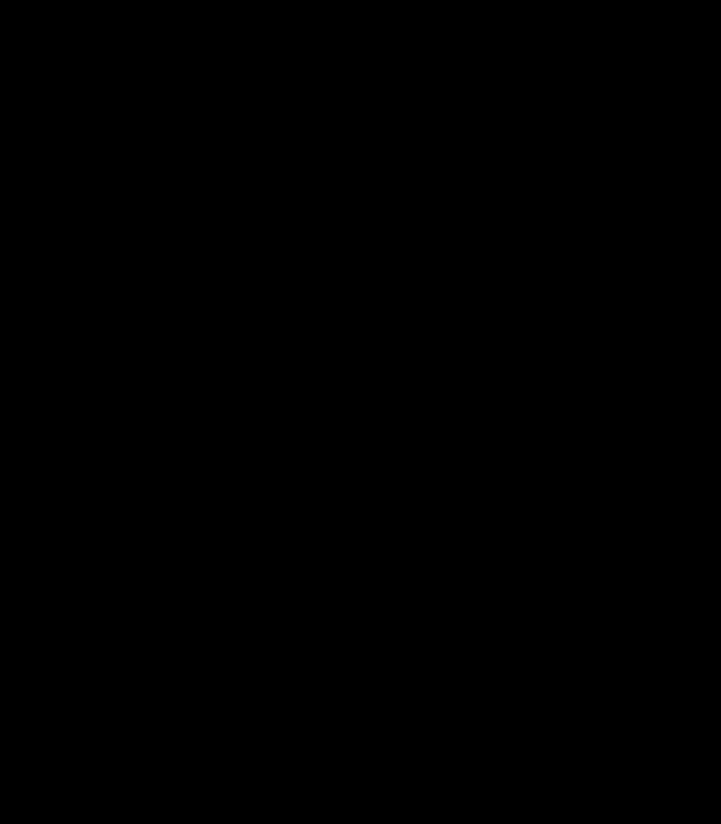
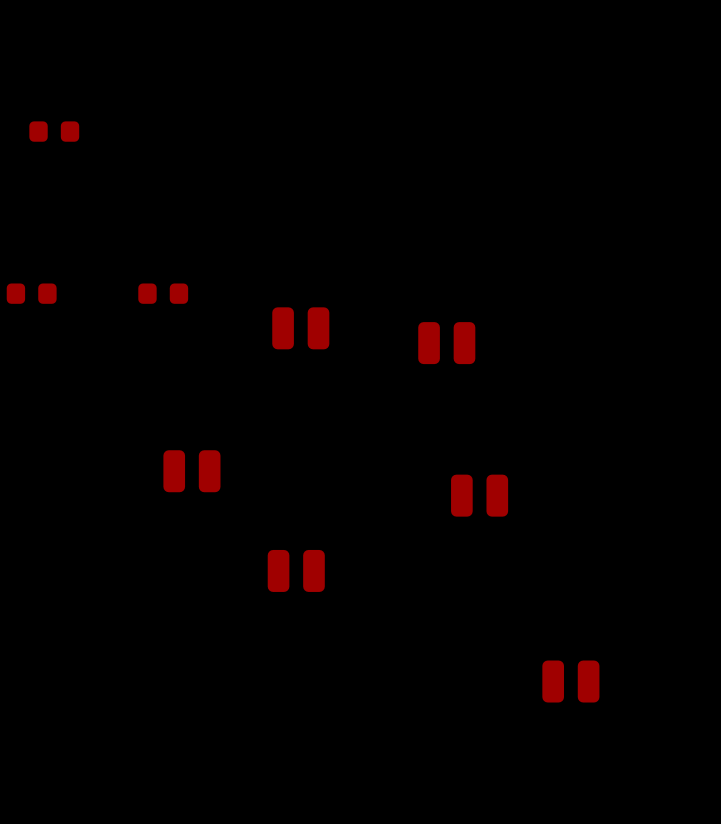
part: none -> (54, 131)
part: none -> (31, 293)
part: none -> (163, 293)
part: none -> (300, 328)
part: none -> (446, 343)
part: none -> (191, 471)
part: none -> (479, 495)
part: none -> (296, 570)
part: none -> (570, 681)

